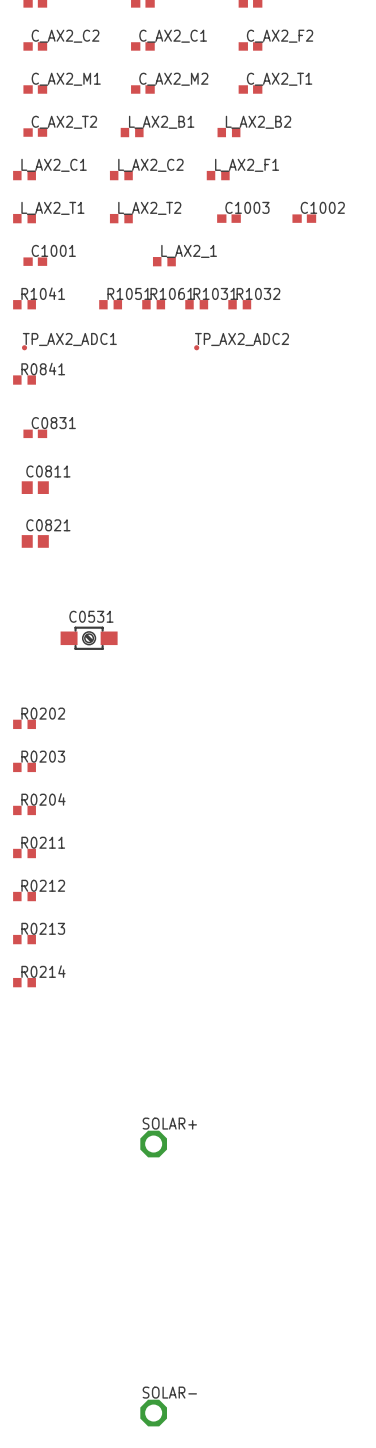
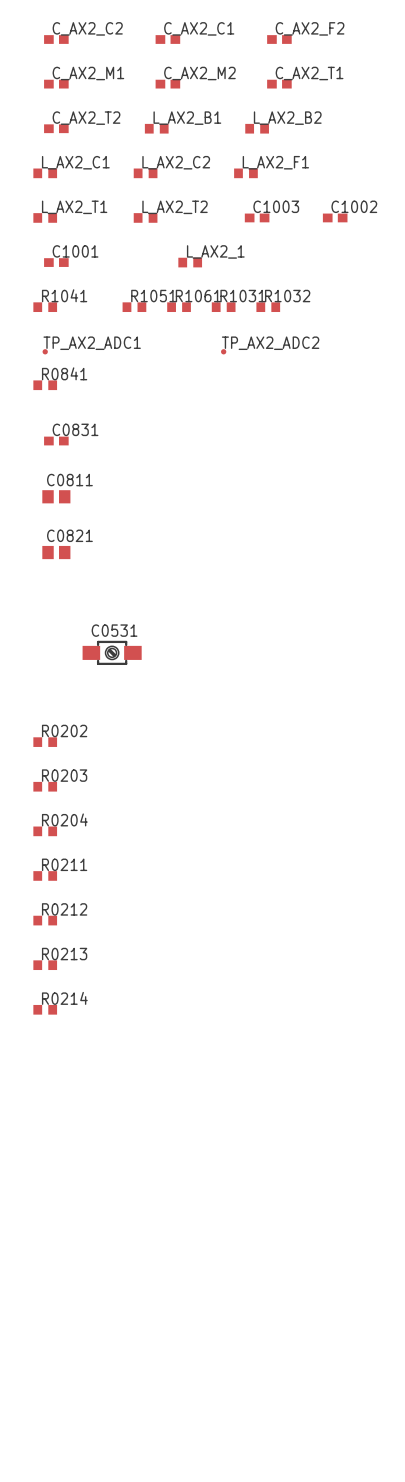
SOLAR+: (153, 1144) -> none
SOLAR-: (153, 1413) -> none

